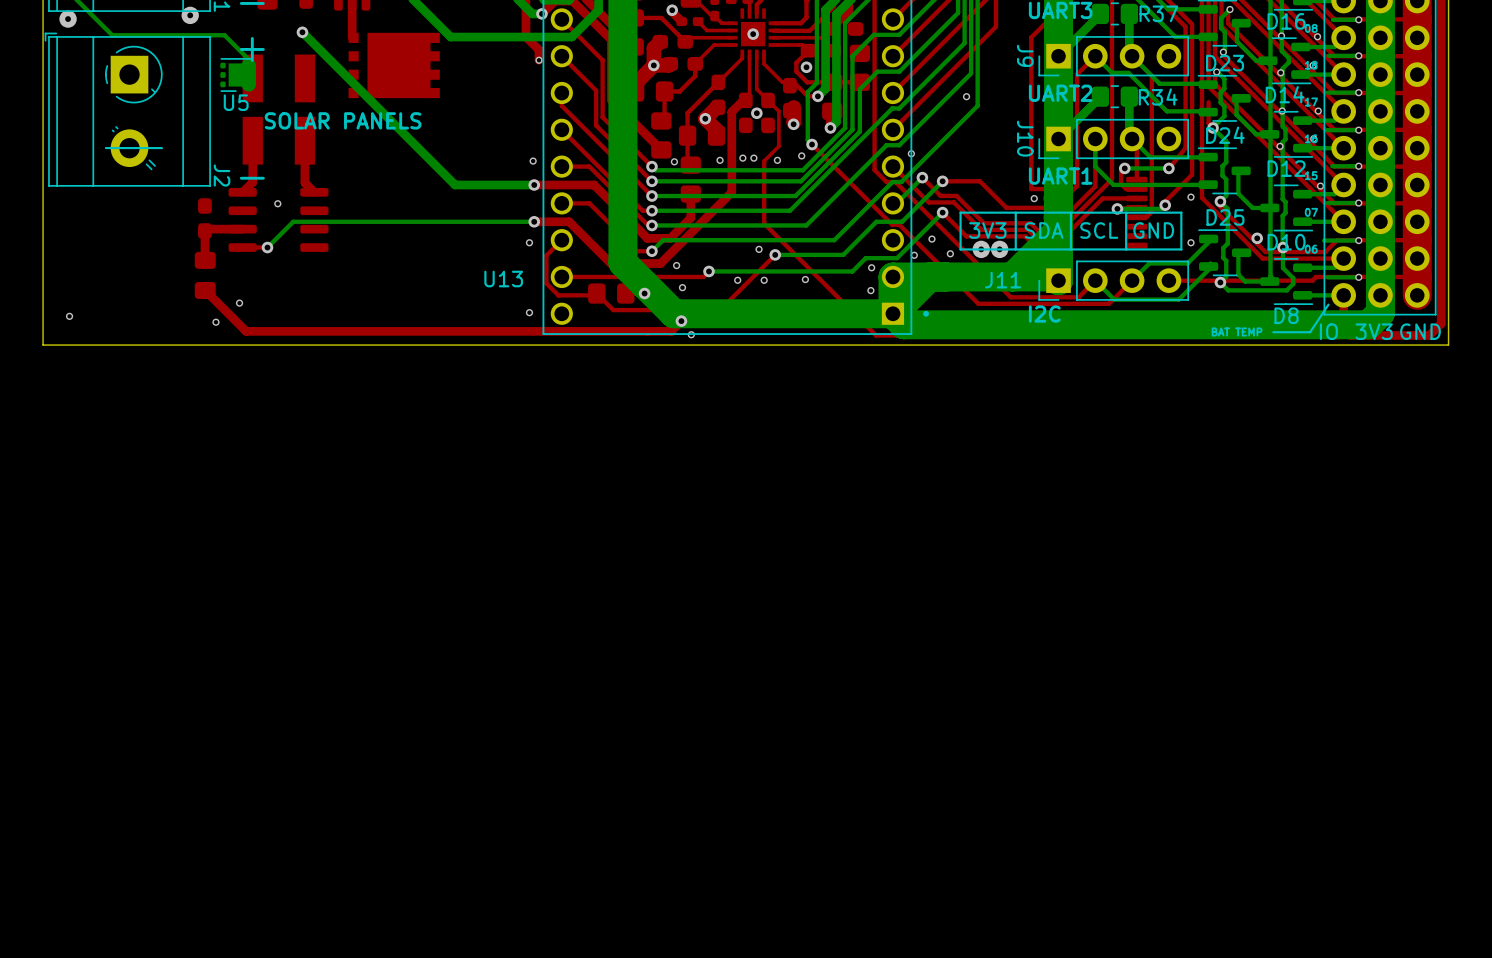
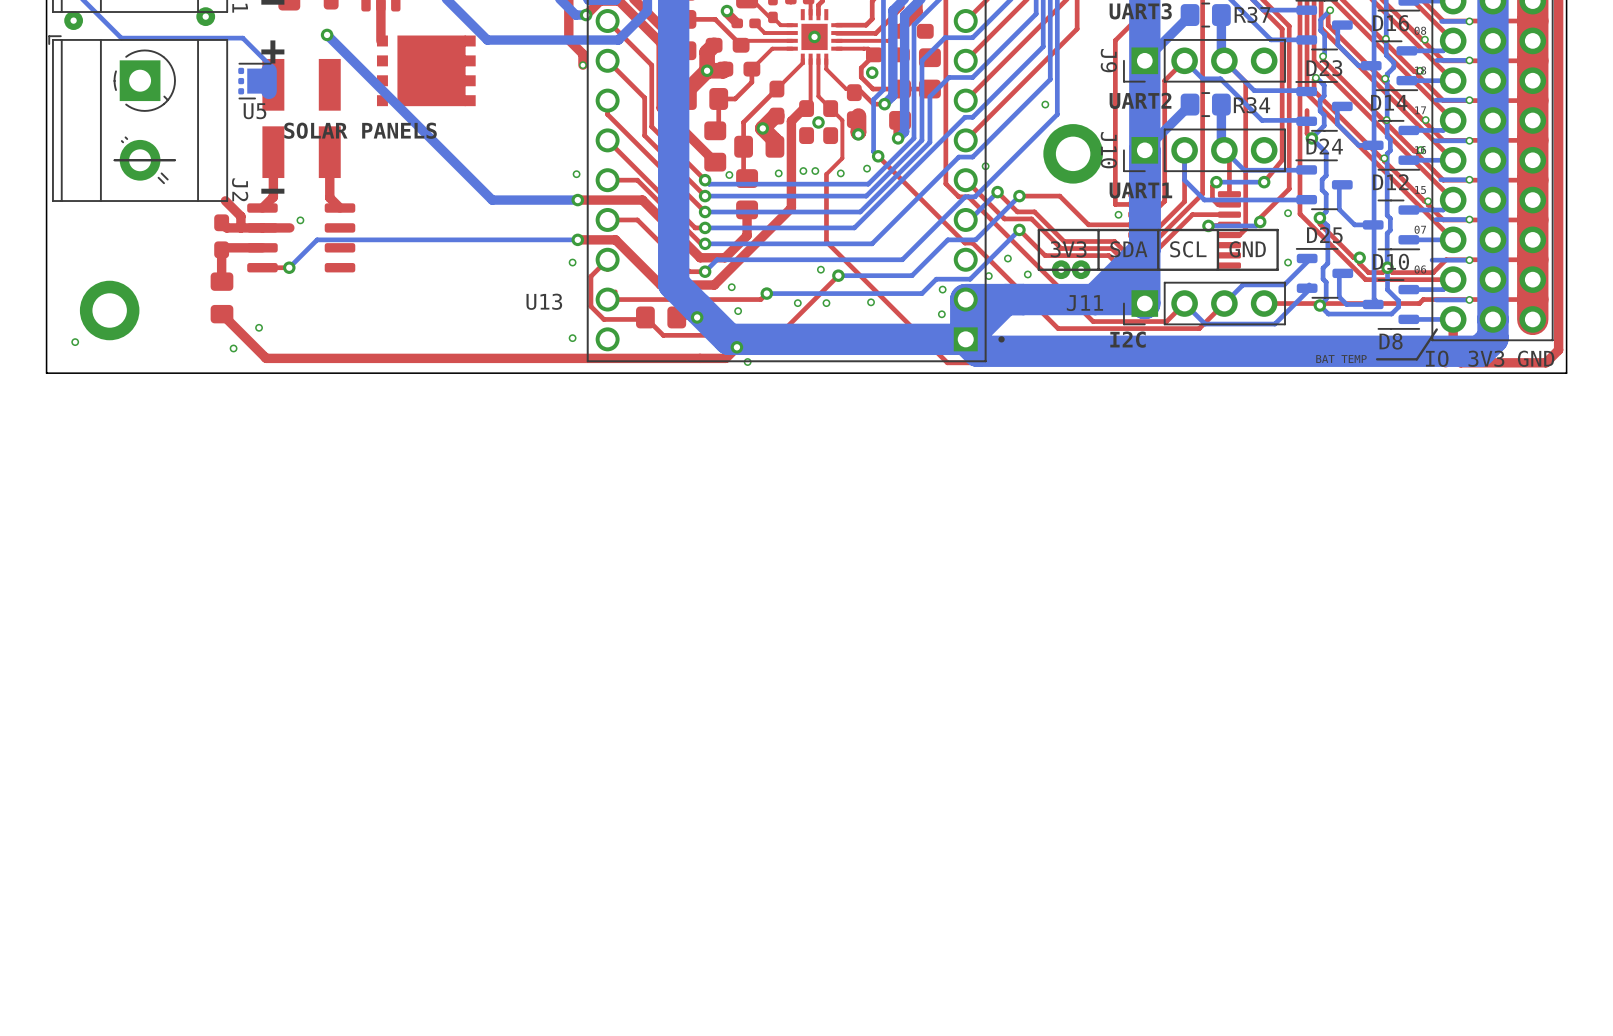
part: none -> (1073, 153)
top track: none -> (225, 200) (240, 216) (240, 227)
top track: none -> (221, 222) (226, 227) (289, 227)
part: none -> (109, 310)

